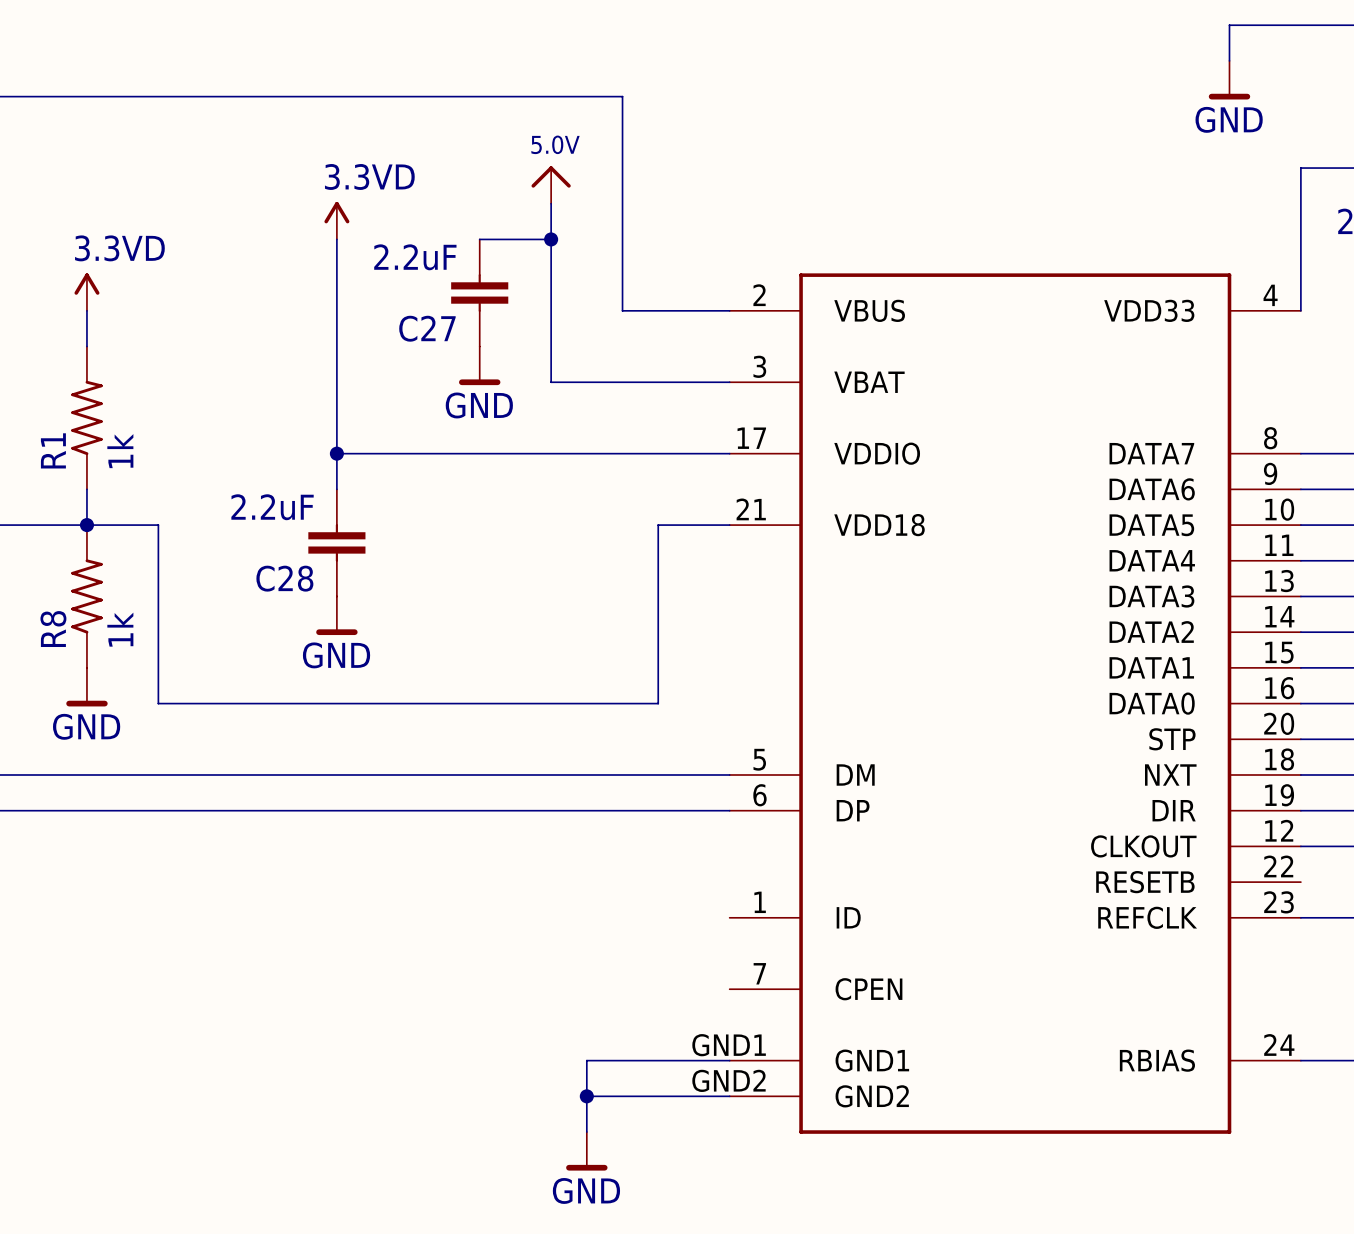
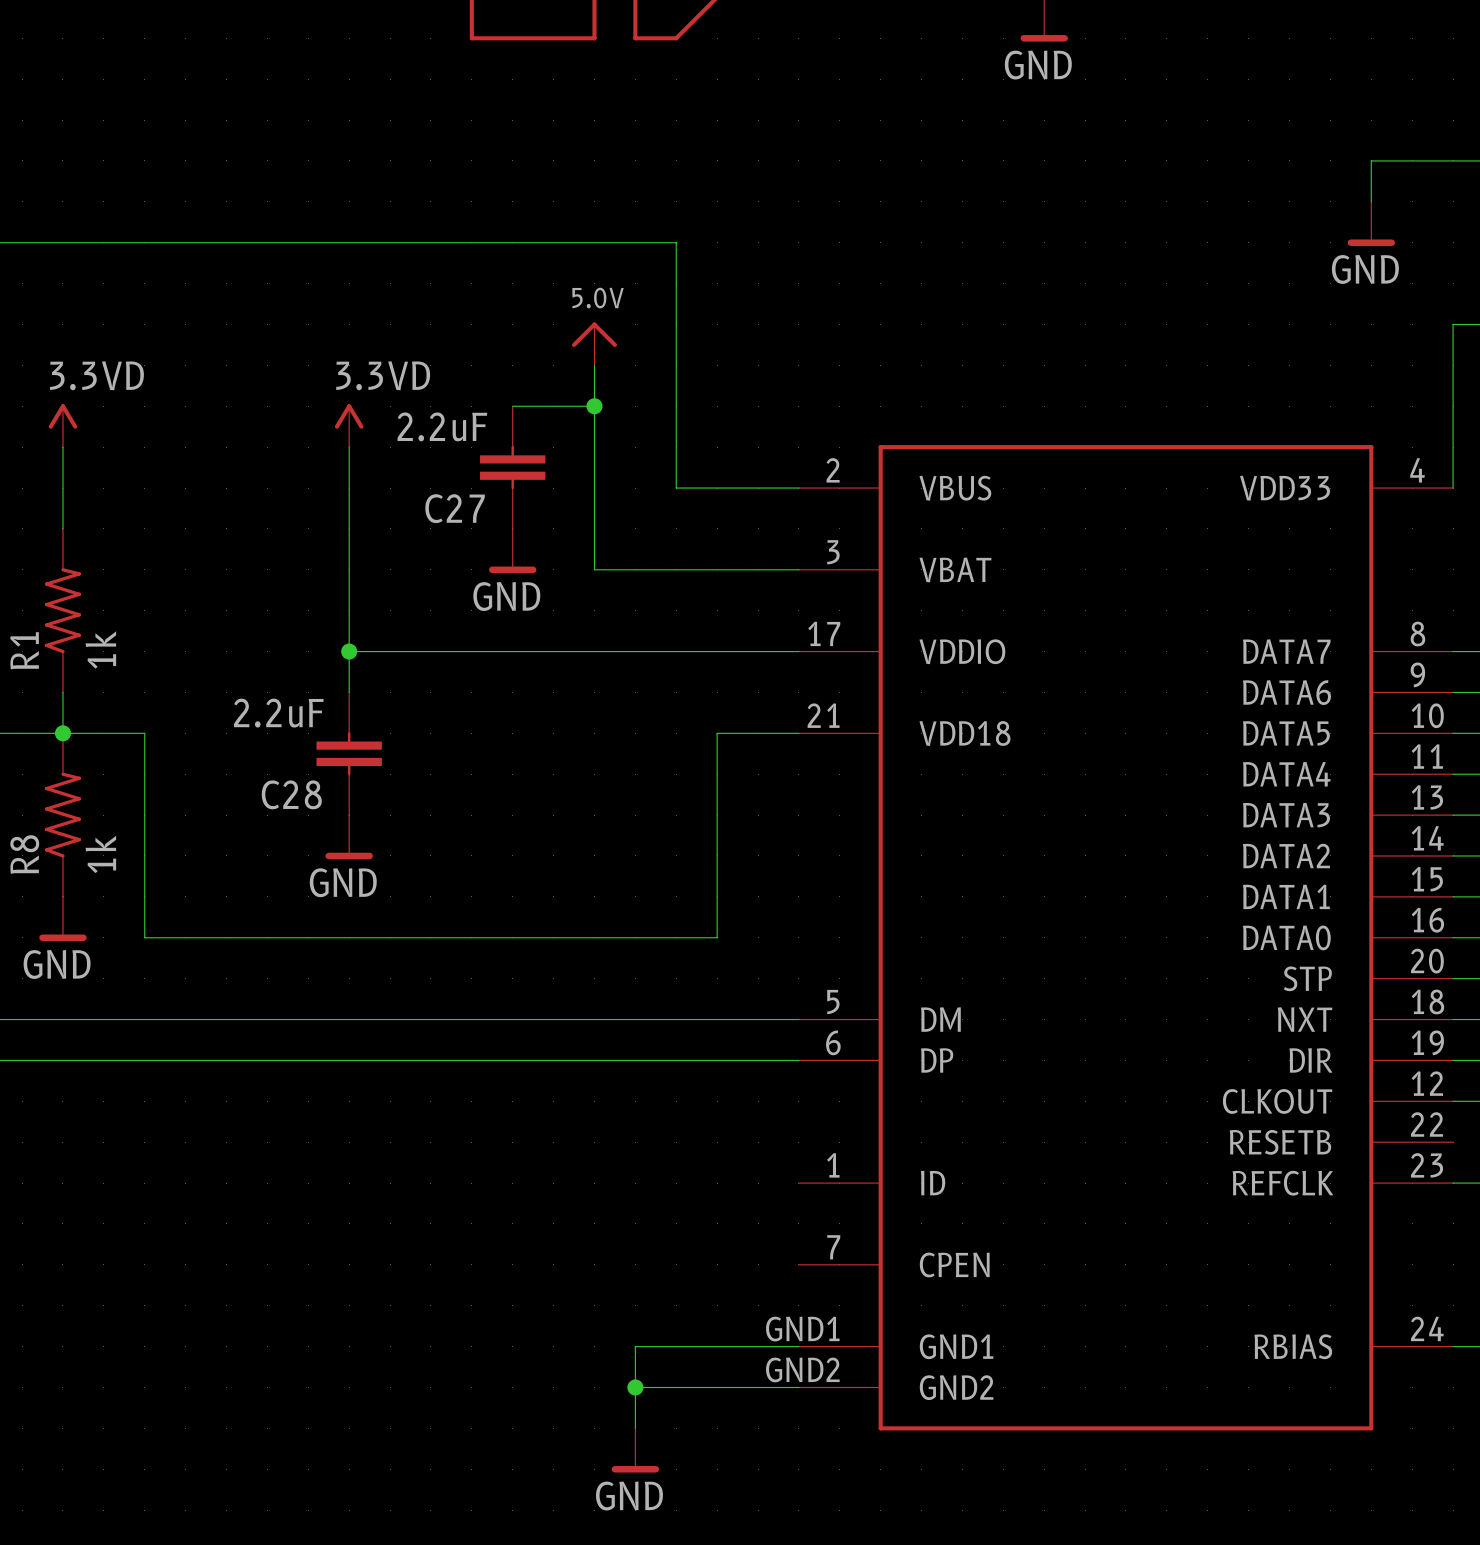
power symbol position: 3.3VD (336, 220) -> 3.3VD (349, 425)
power symbol position: 3.3VD (86, 292) -> 3.3VD (62, 425)

